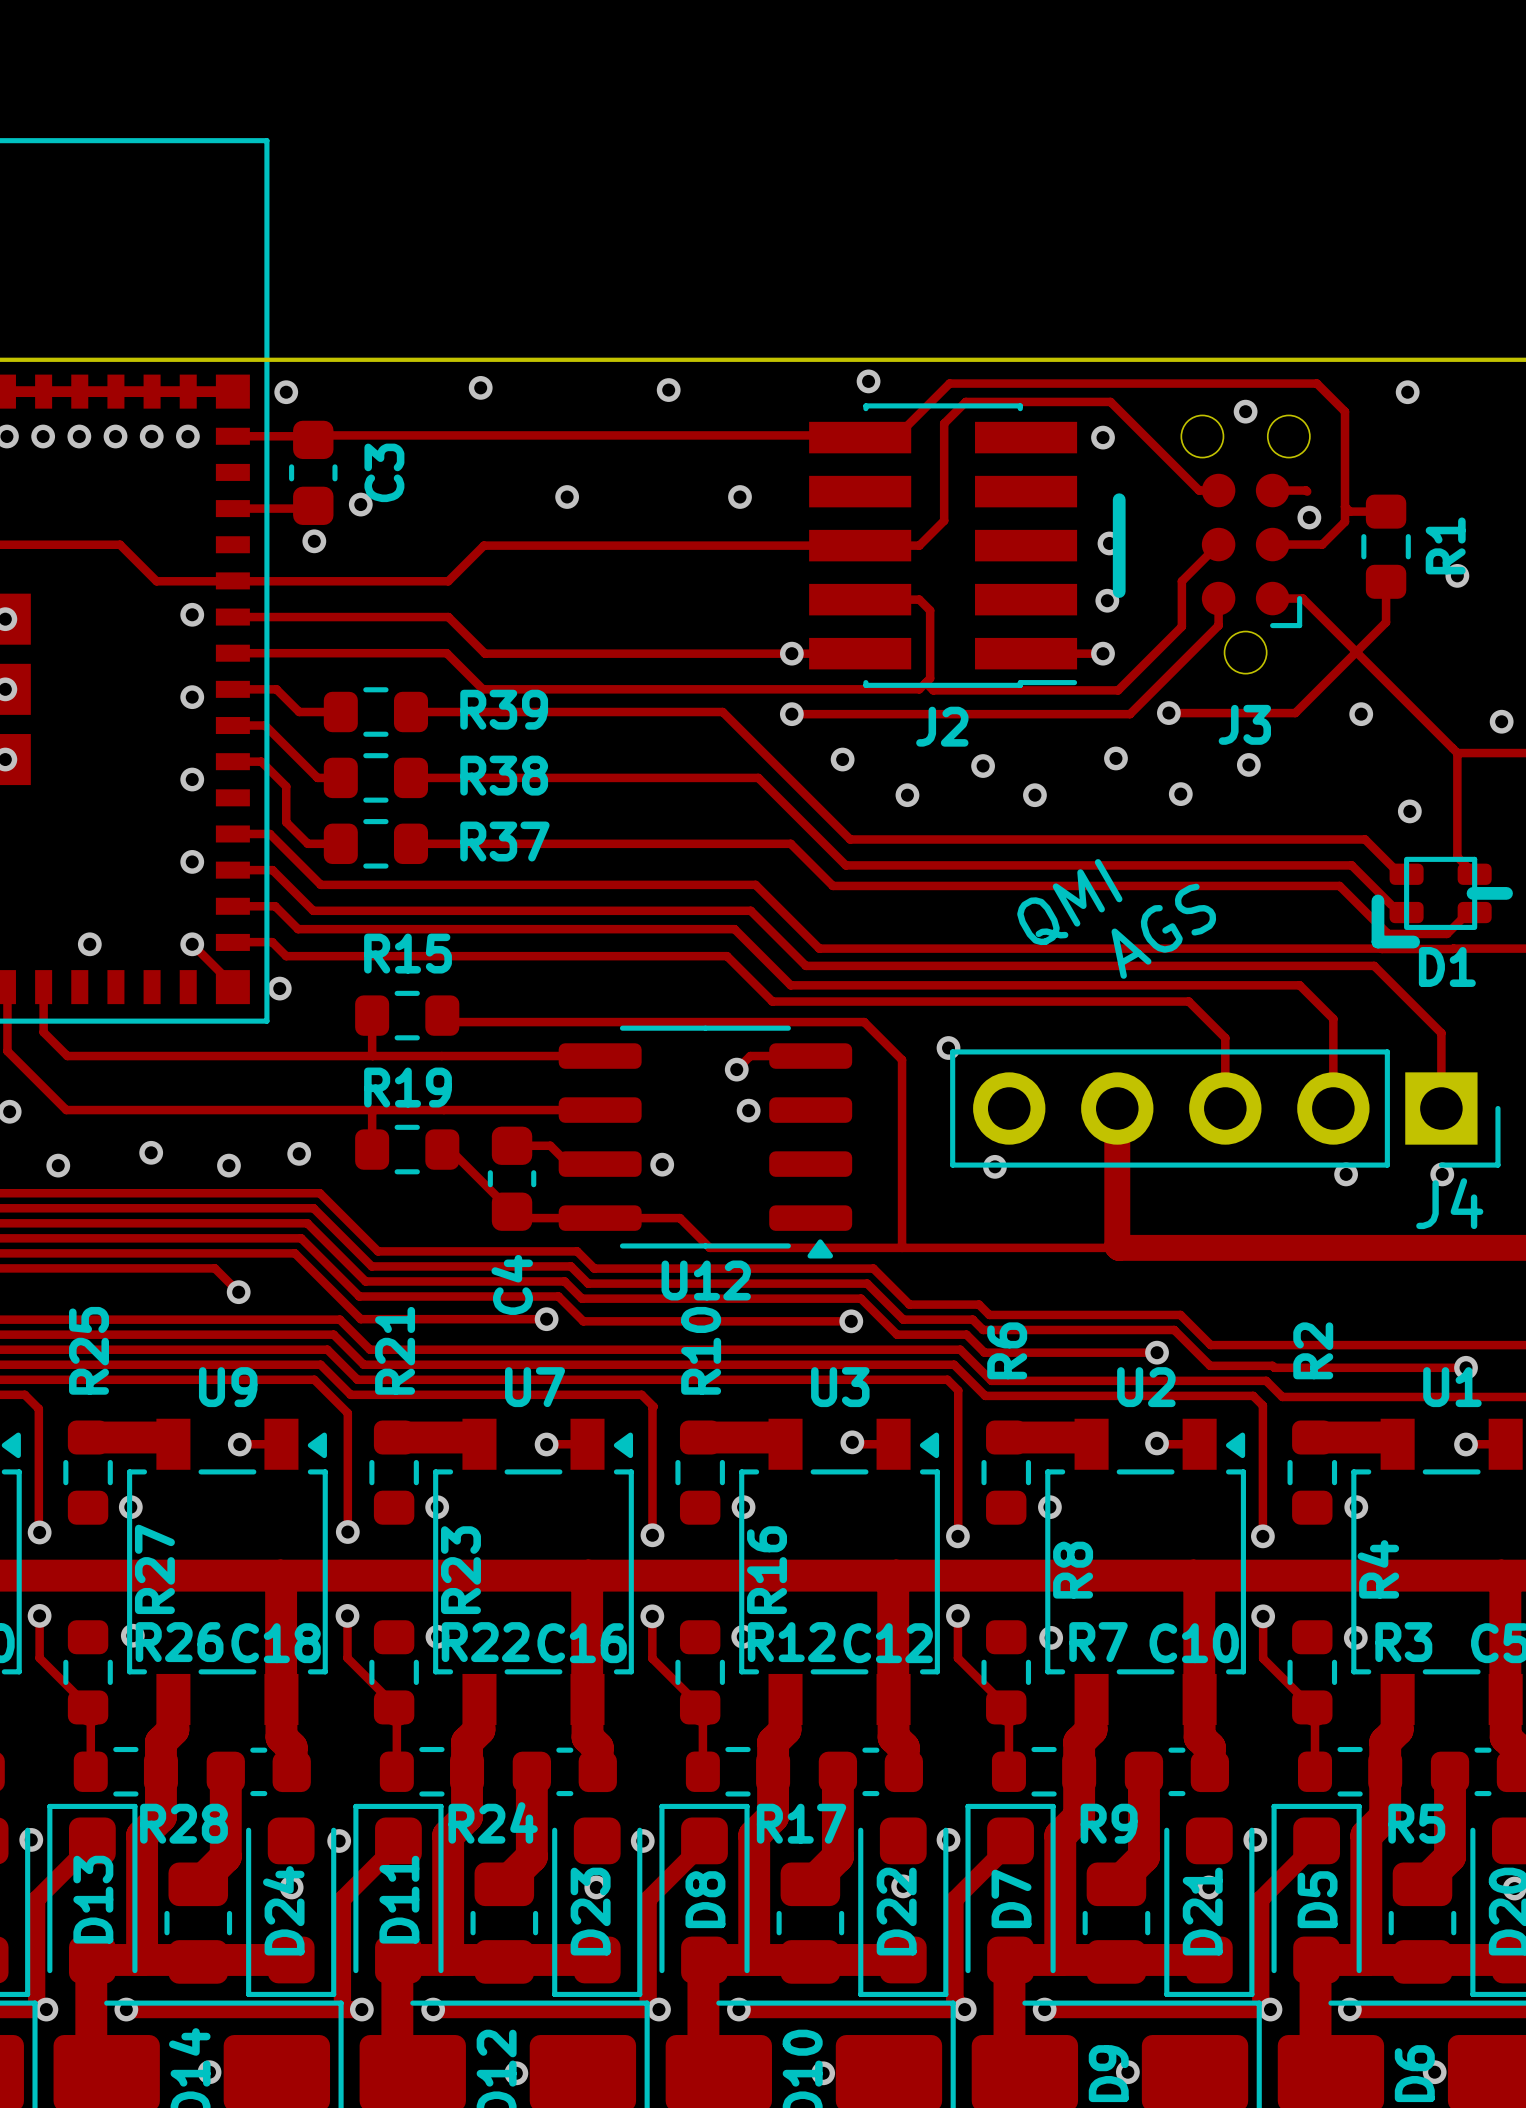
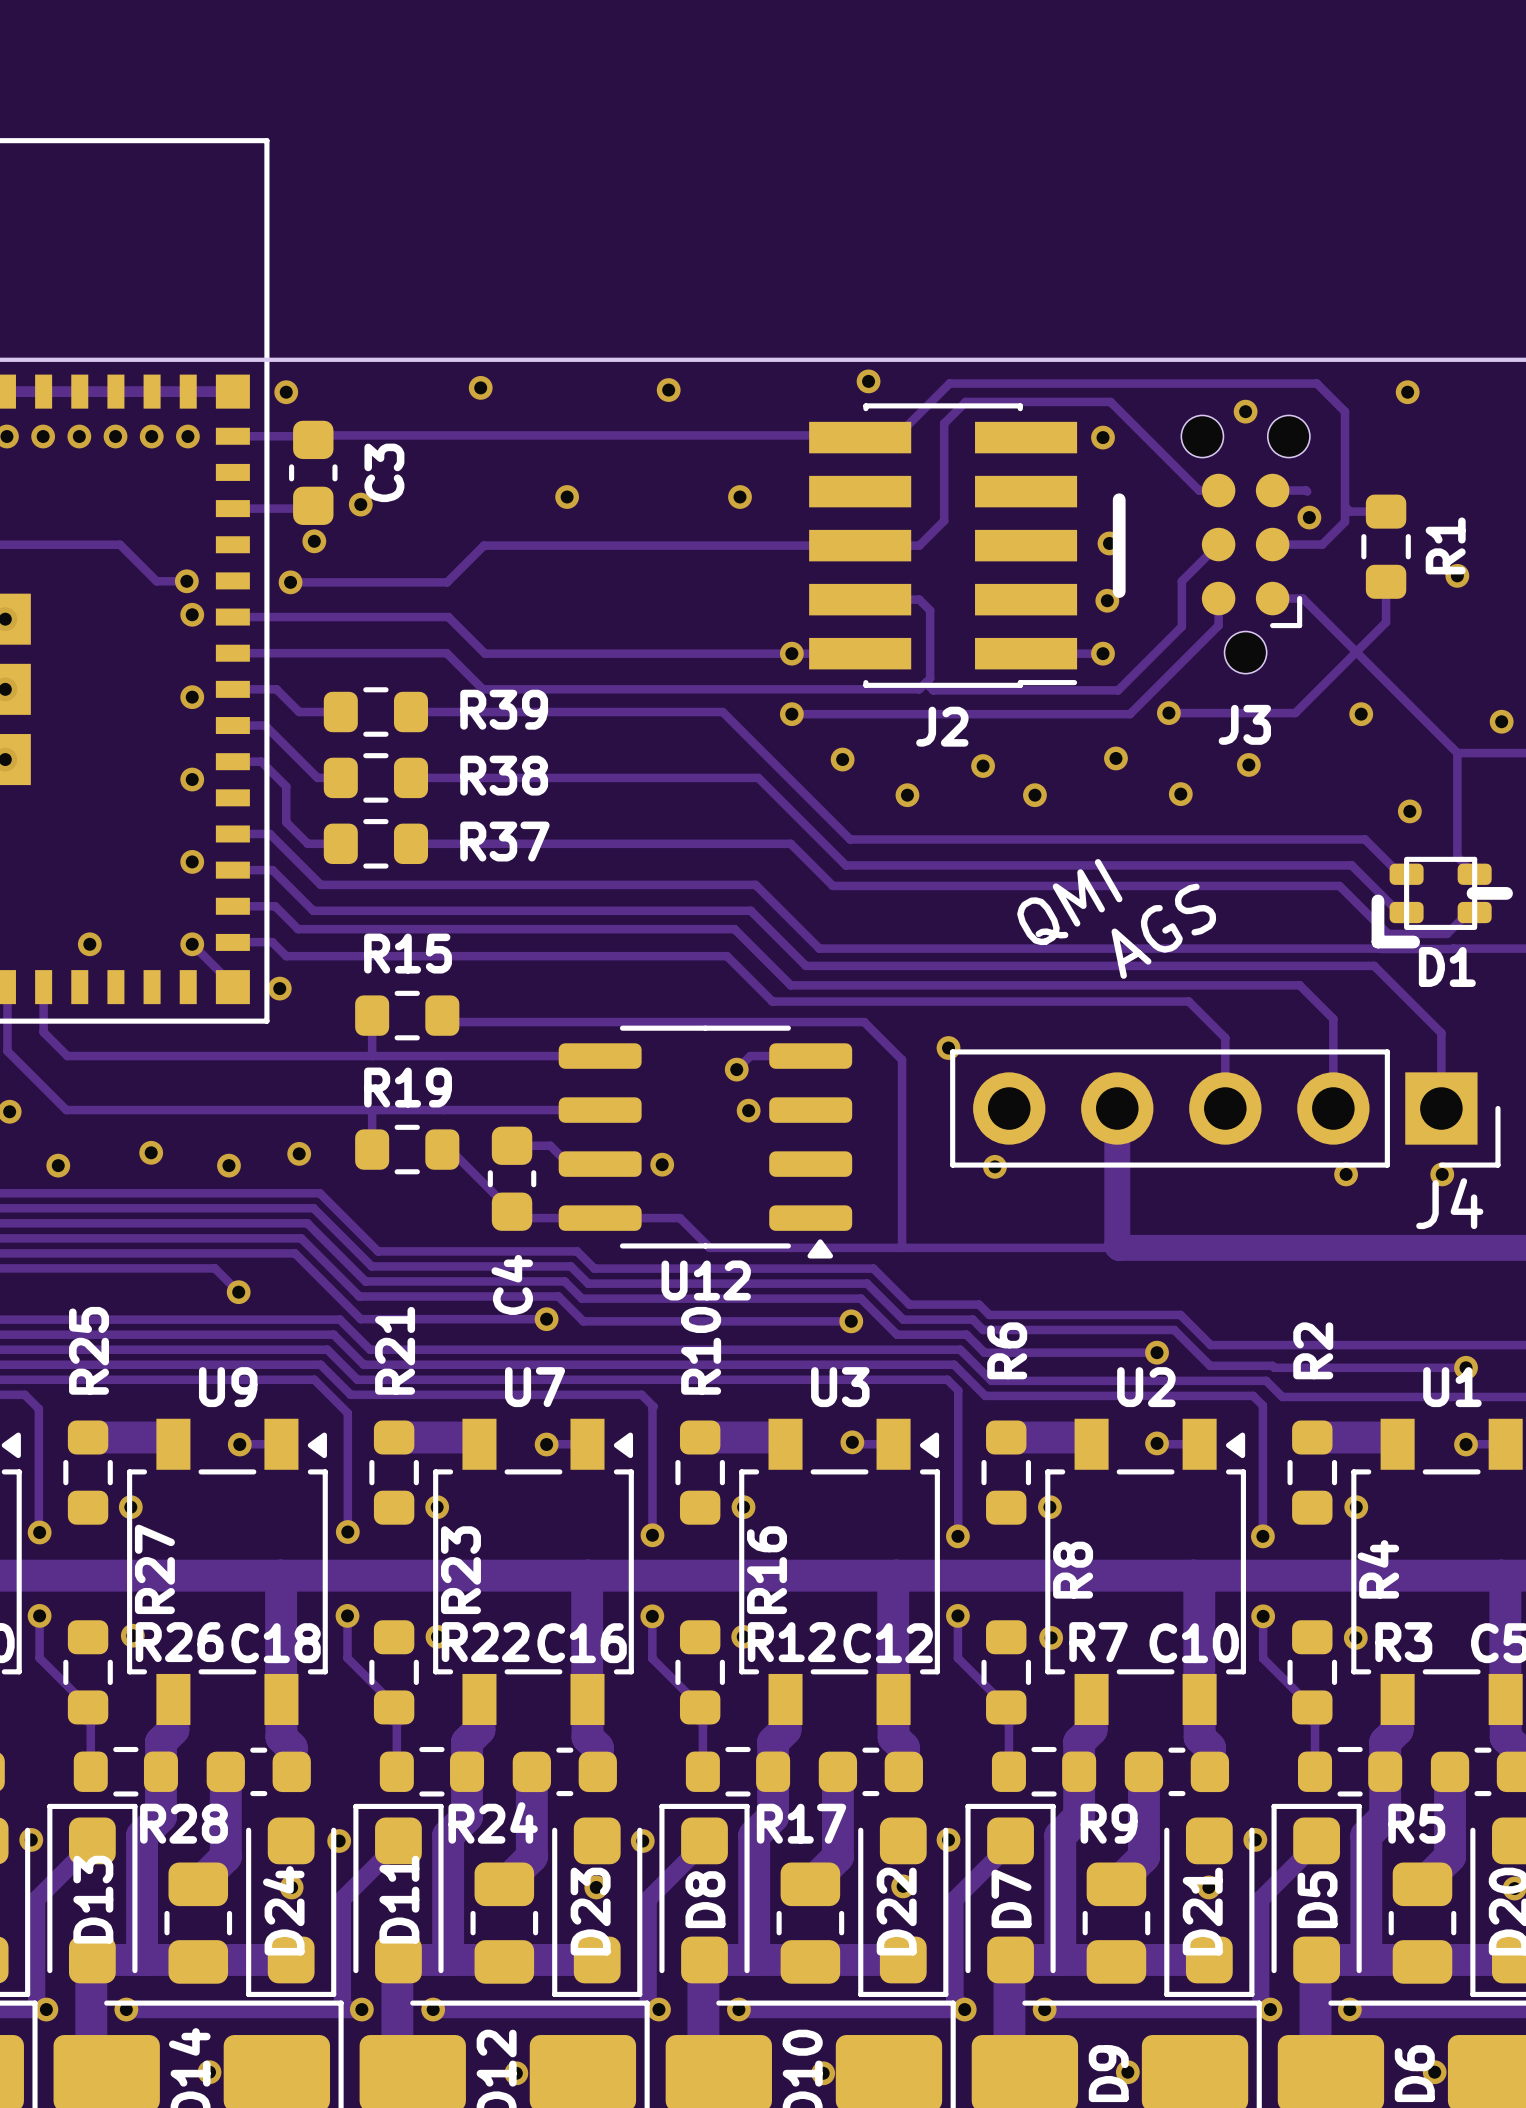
track: (186, 581) (448, 581) -> (290, 582) (448, 581)
via: none -> (186, 581)
via: none -> (290, 582)

